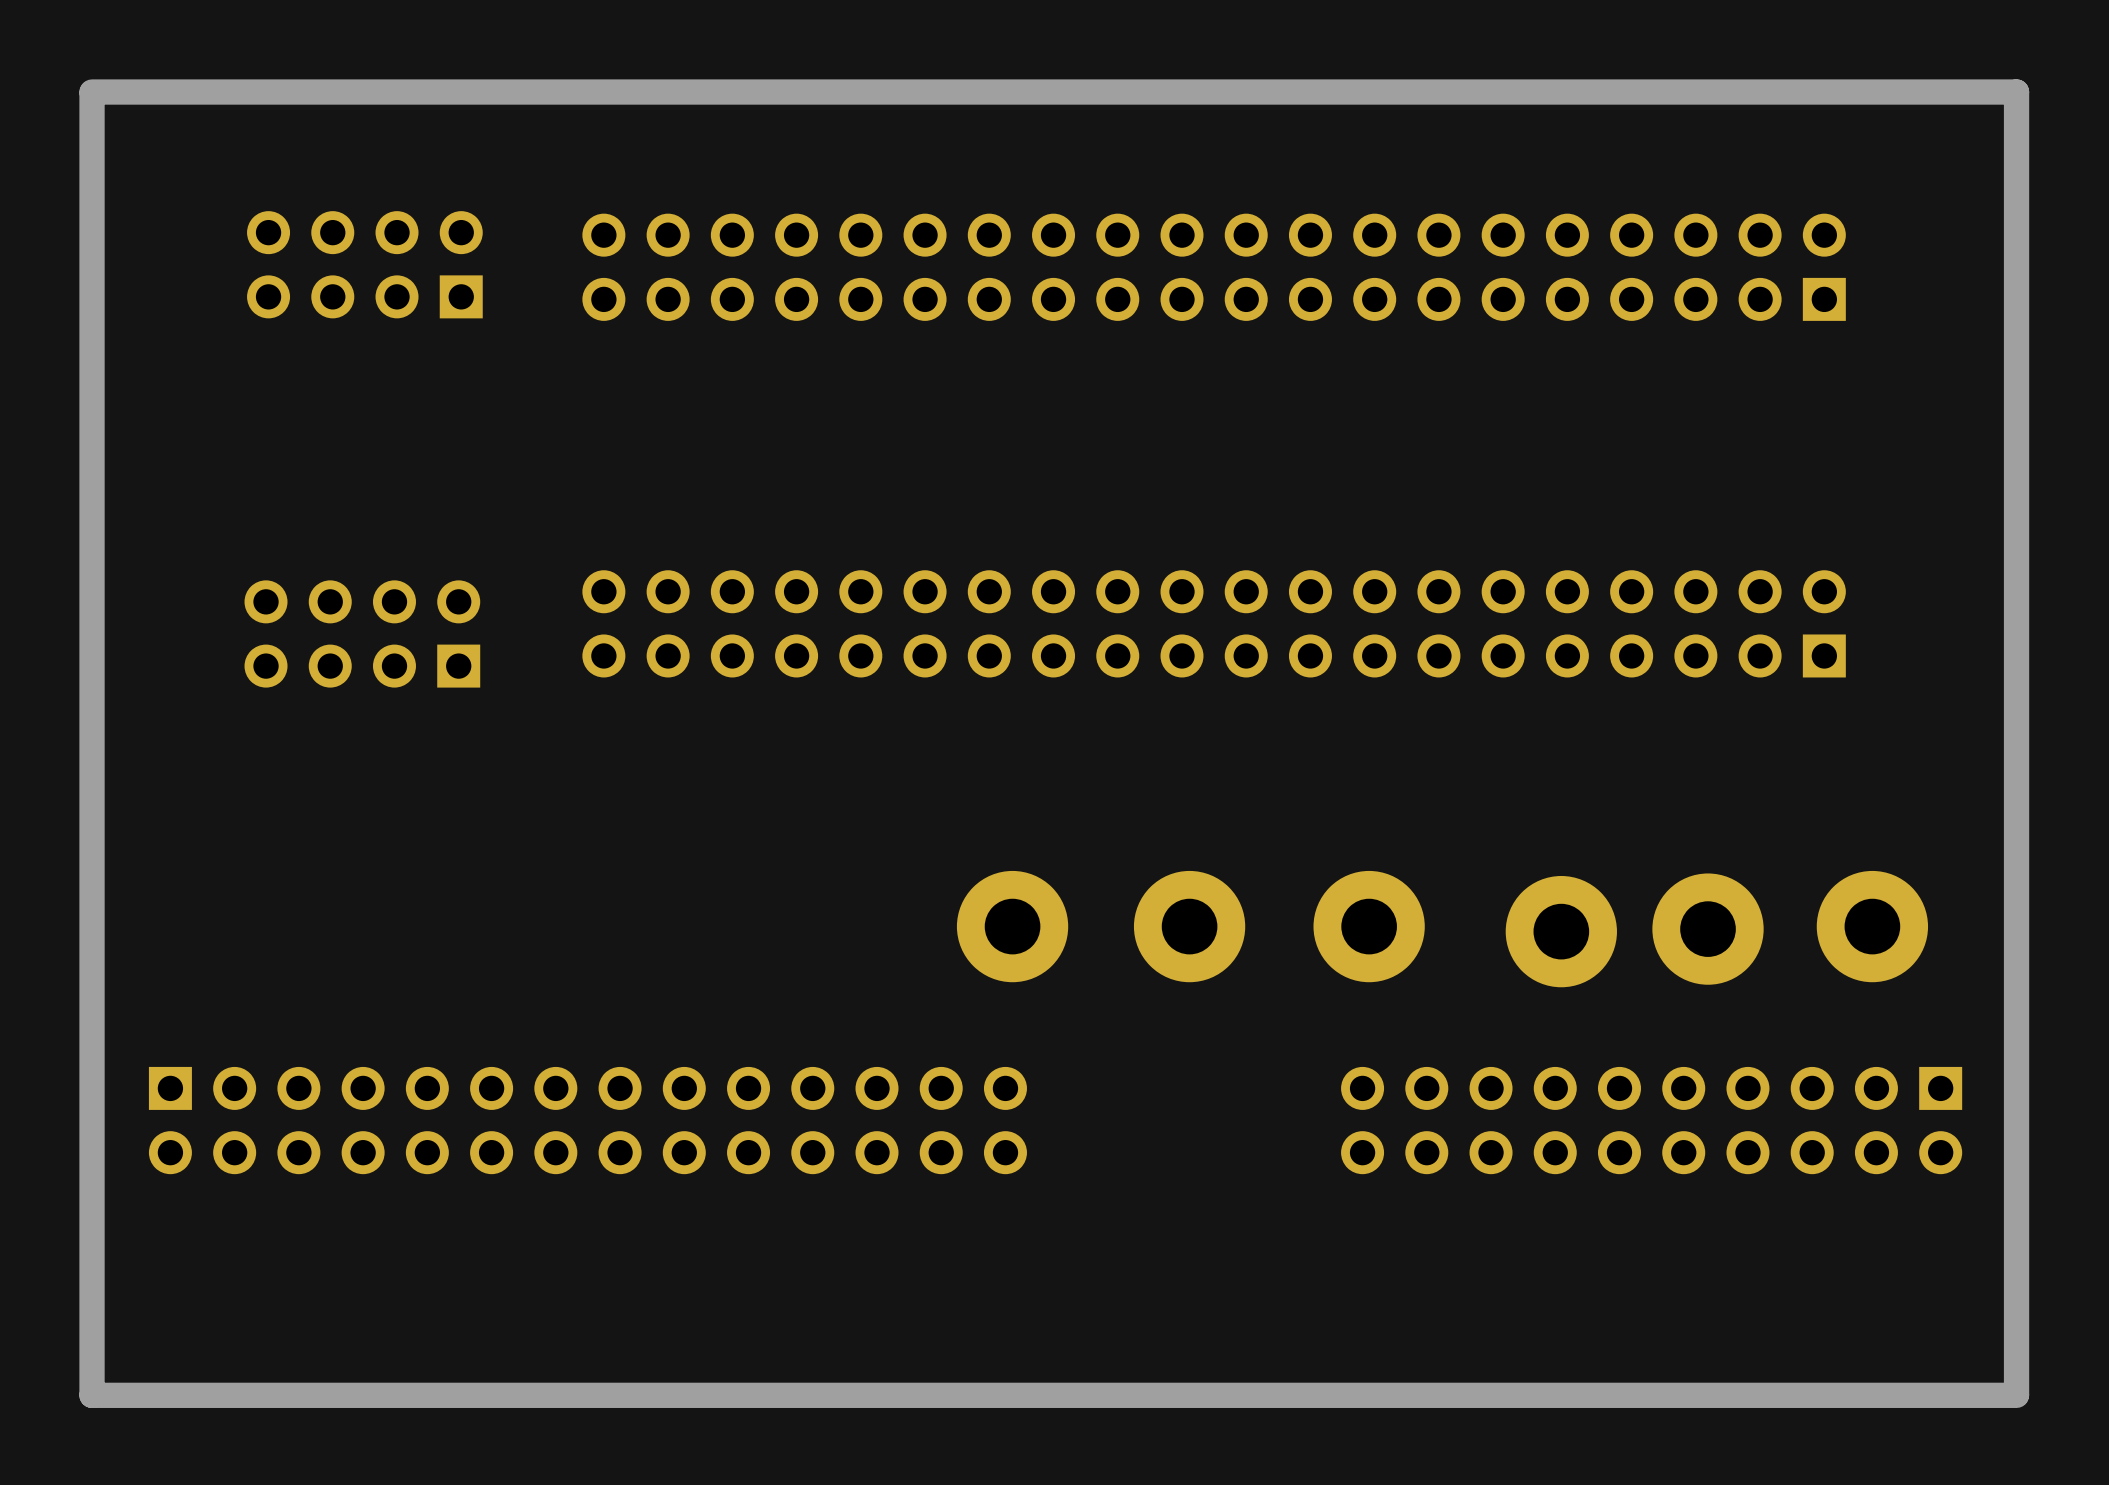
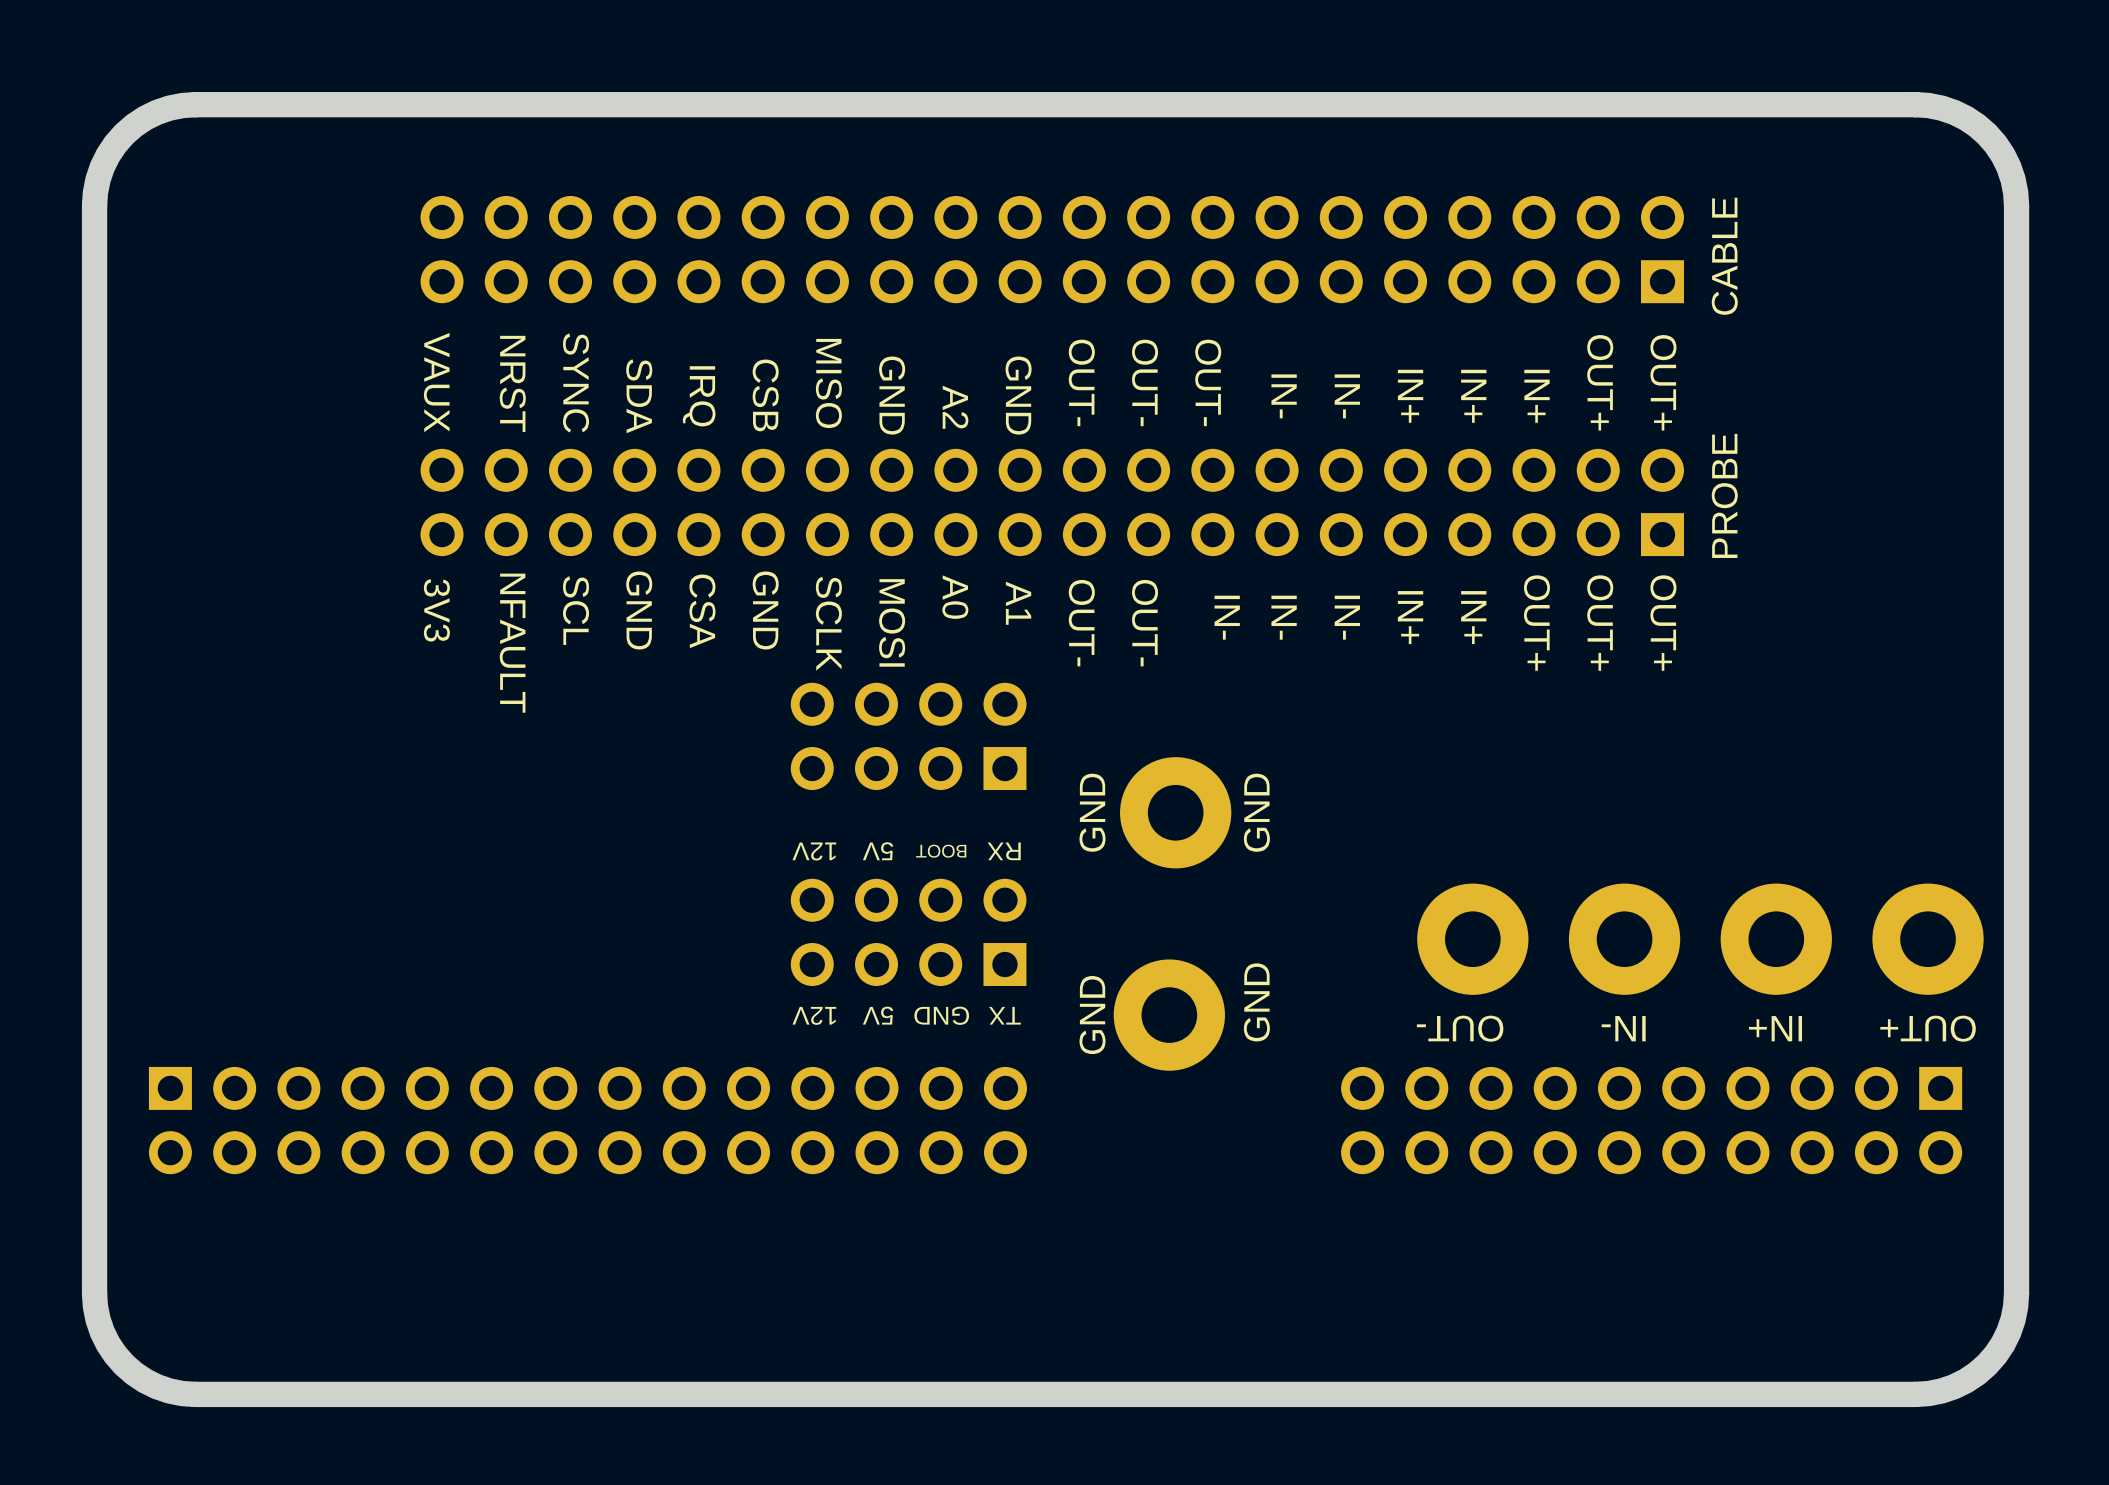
board edge: (92, 92) (2016, 92) (2016, 205) -> none
board edge: (92, 92) (92, 1395) (2016, 1395) -> none
part: none -> (1052, 249)
text: none -> CABLE (1724, 256)
part: (364, 264) -> none
part: (1214, 267) -> none
text: none -> VAUX (436, 382)
text: none -> SYNC (576, 382)
text: none -> OUT- (1081, 382)
text: none -> OUT- (1145, 382)
text: none -> OUT- (1208, 382)
text: none -> OUT+ (1600, 382)
text: none -> OUT+ (1663, 382)
text: none -> MISO (828, 383)
text: none -> NRST (512, 383)
text: none -> CSB (765, 395)
text: none -> GND (892, 395)
text: none -> GND (1018, 395)
text: none -> IN- (1284, 396)
text: none -> IN- (1347, 396)
text: none -> IN+ (1410, 396)
text: none -> IN+ (1473, 396)
text: none -> IN+ (1536, 396)
text: none -> SDA (639, 396)
text: none -> IRQ (699, 396)
text: none -> A2 (955, 407)
text: none -> PROBE (1724, 495)
part: none -> (1052, 502)
text: none -> A0 (955, 597)
text: none -> A1 (1018, 603)
text: none -> 3V3 (436, 610)
text: none -> GND (639, 610)
text: none -> GND (765, 610)
text: none -> SCL (576, 610)
text: none -> CSA (702, 611)
text: none -> IN- (1227, 617)
text: none -> IN- (1284, 617)
text: none -> IN- (1347, 617)
text: none -> IN+ (1410, 617)
text: none -> IN+ (1473, 617)
text: none -> OUT- (1081, 623)
text: none -> OUT- (1145, 623)
text: none -> OUT+ (1537, 623)
text: none -> OUT+ (1600, 623)
text: none -> OUT+ (1663, 623)
text: none -> SCLK (828, 623)
text: none -> MOSI (892, 622)
part: (1214, 623) -> none
part: (362, 633) -> none
text: none -> NFAULT (512, 643)
part: none -> (908, 736)
text: none -> GND (1092, 812)
part: none -> (1175, 812)
text: none -> GND (1256, 812)
text: none -> 12V (814, 851)
text: none -> 5V (878, 851)
text: none -> BOOT (941, 851)
text: none -> RX (1004, 851)
part: (1012, 926) -> none
part: (1189, 926) -> none
part: (1369, 926) -> none
part: (1872, 926) -> none
part: (1708, 929) -> none
part: (1561, 931) -> none
part: none -> (908, 932)
part: none -> (1472, 939)
part: none -> (1624, 939)
part: none -> (1776, 939)
part: none -> (1928, 939)
text: none -> GND (1256, 1002)
text: none -> 12V (814, 1015)
text: none -> 5V (878, 1015)
text: none -> GND (941, 1015)
text: none -> TX (1004, 1015)
text: none -> GND (1092, 1015)
part: none -> (1169, 1015)
text: none -> OUT- (1460, 1028)
text: none -> IN- (1623, 1028)
text: none -> IN+ (1775, 1028)
text: none -> OUT+ (1928, 1028)
board edge: (2016, 1293) (2016, 1394) -> (2016, 1293) (2013, 1319) (2008, 1331) (1995, 1354) (1986, 1364) (1965, 1380) (1954, 1386) (1941, 1390) (1915, 1394) (195, 1394) (169, 1390) (157, 1386) (145, 1380) (124, 1364) (108, 1343) (102, 1331) (98, 1319) (94, 1293) (94, 205) (98, 179) (108, 155) (124, 134) (145, 118) (169, 108) (195, 104) (1915, 104) (1941, 108) (1954, 112) (1976, 125) (1986, 134) (1995, 144) (2008, 167) (2013, 179) (2016, 205)

